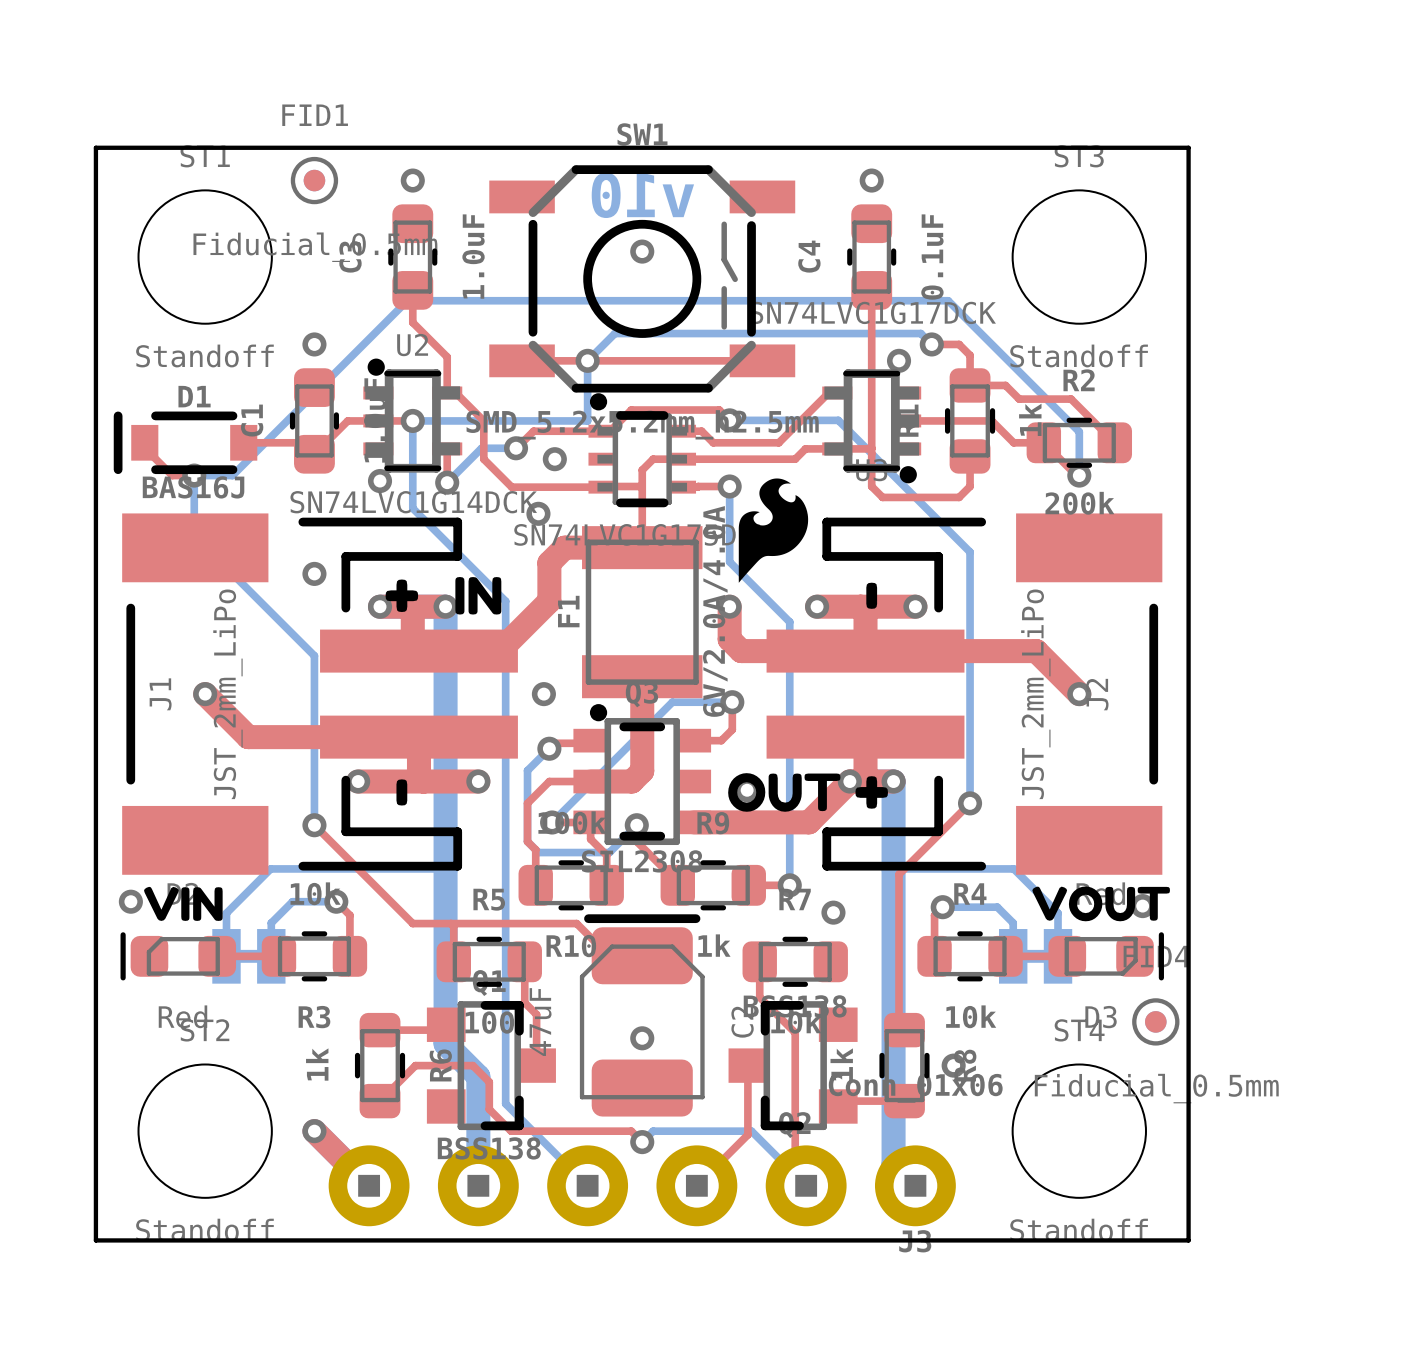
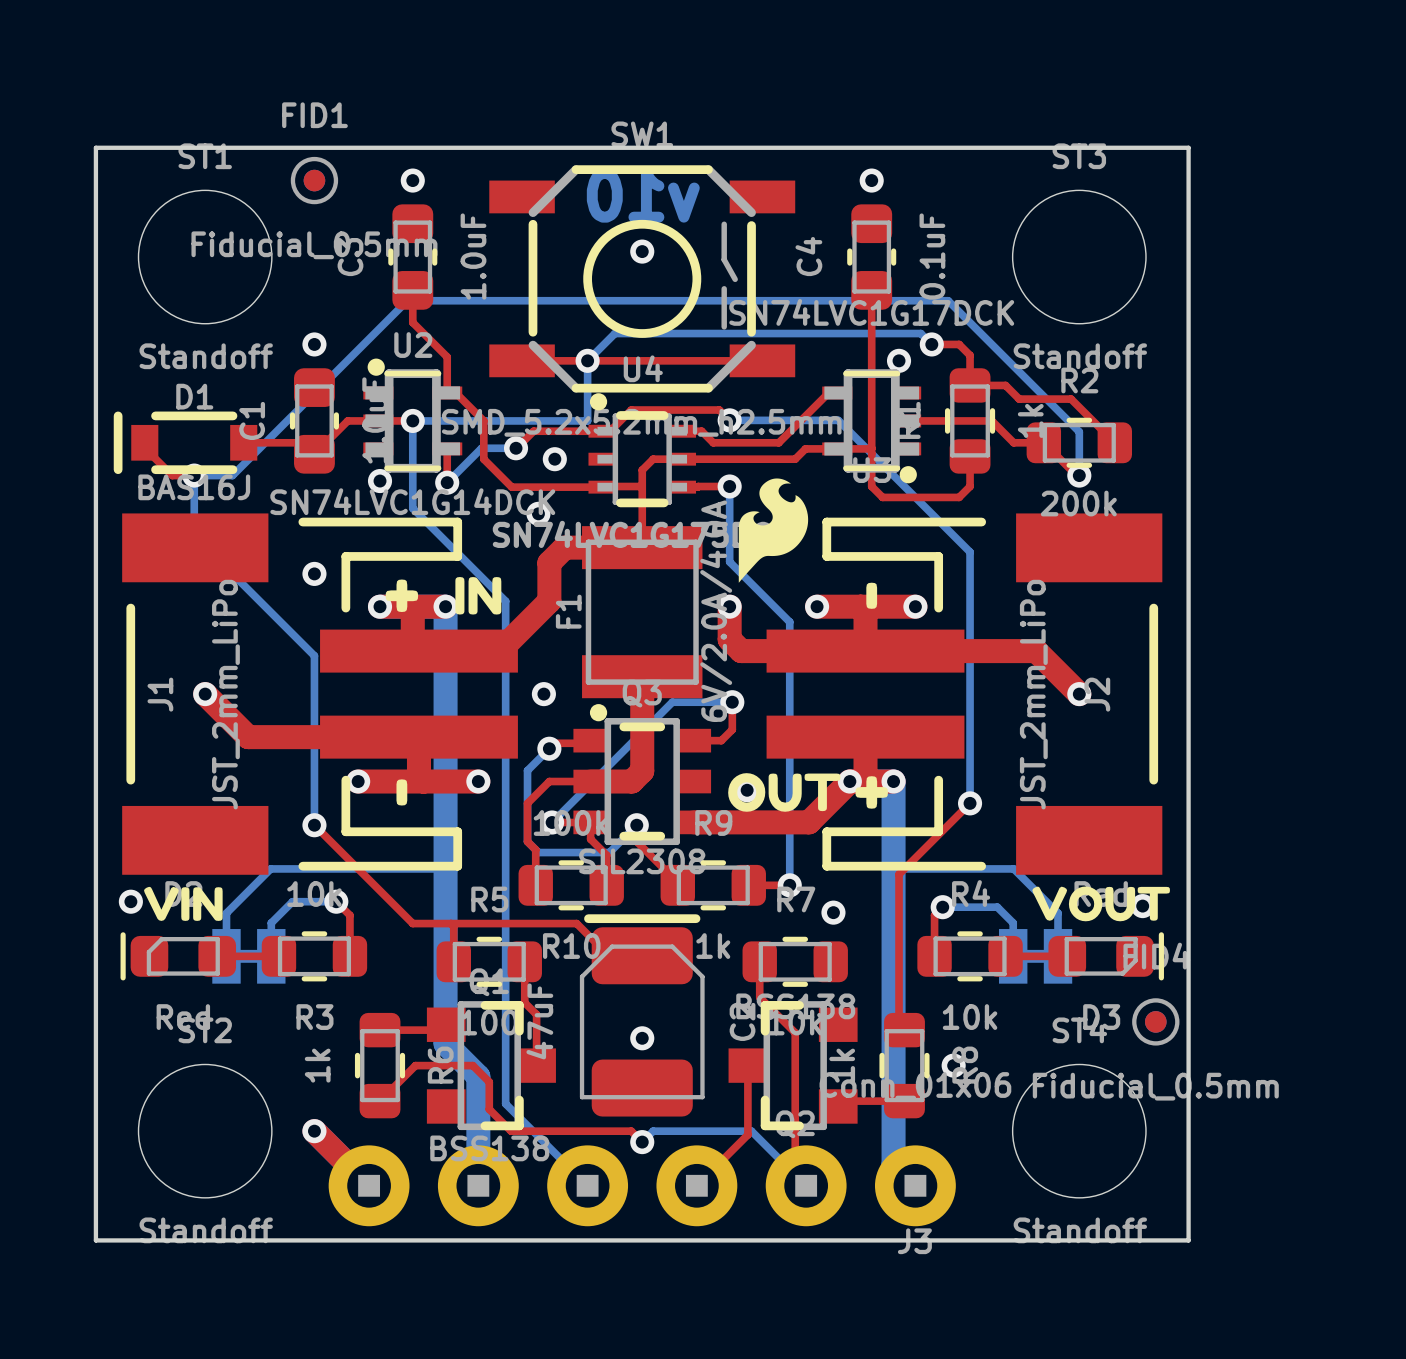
U4 name: none -> U4 (643, 368)

